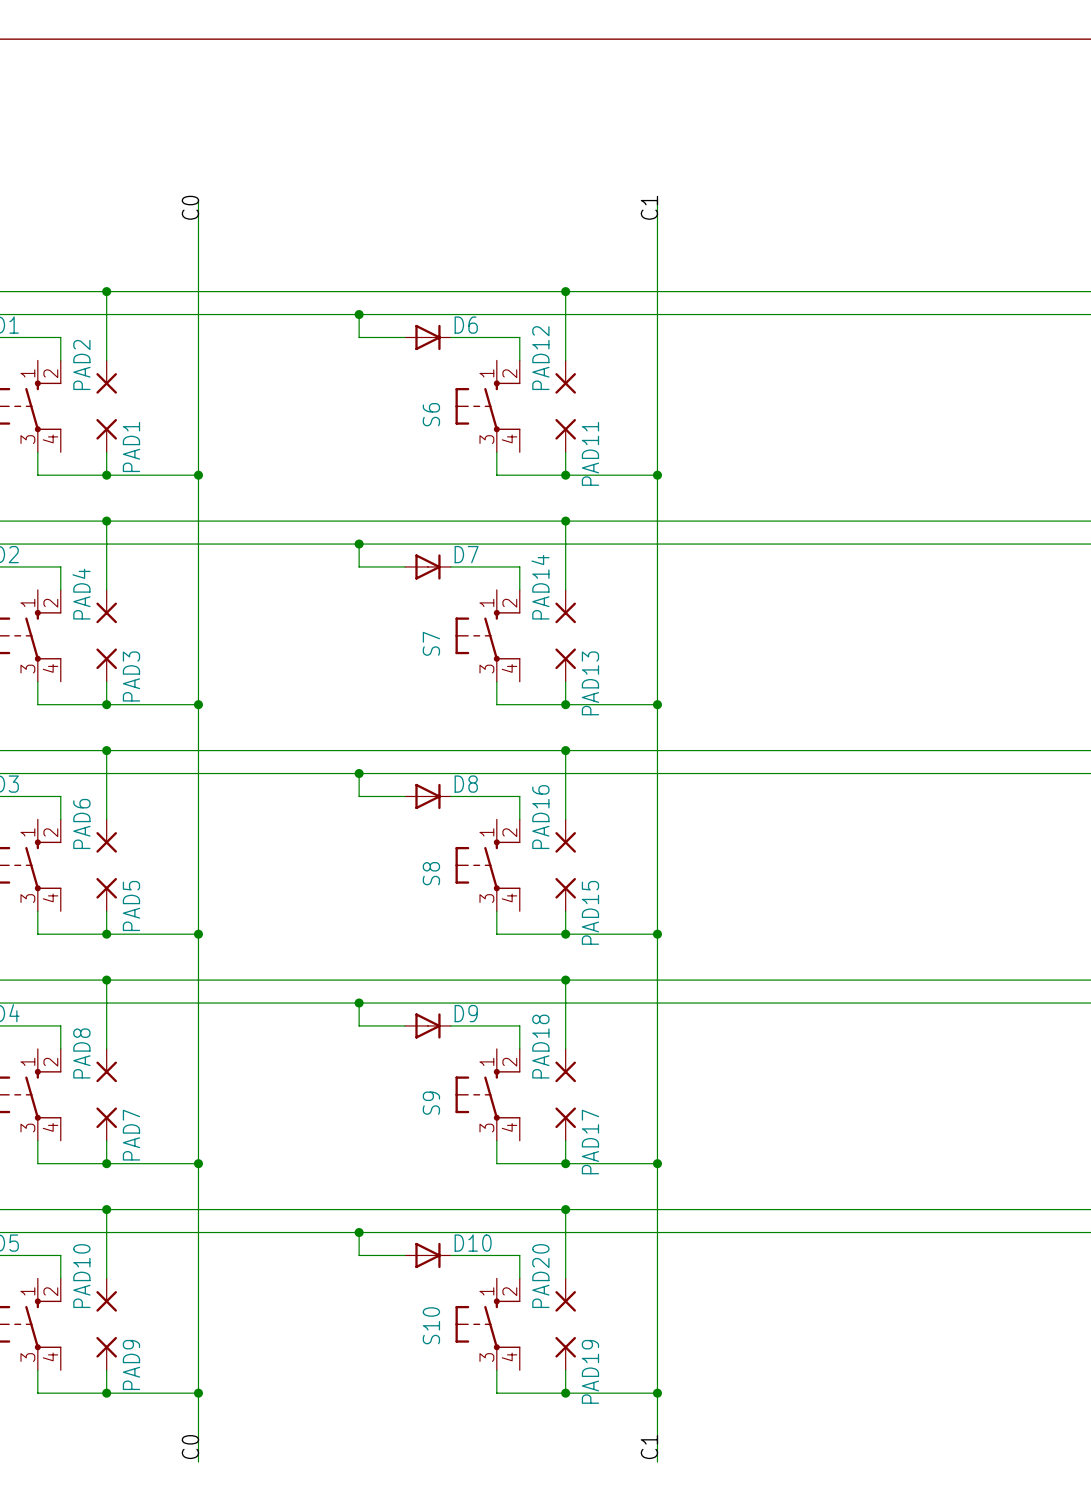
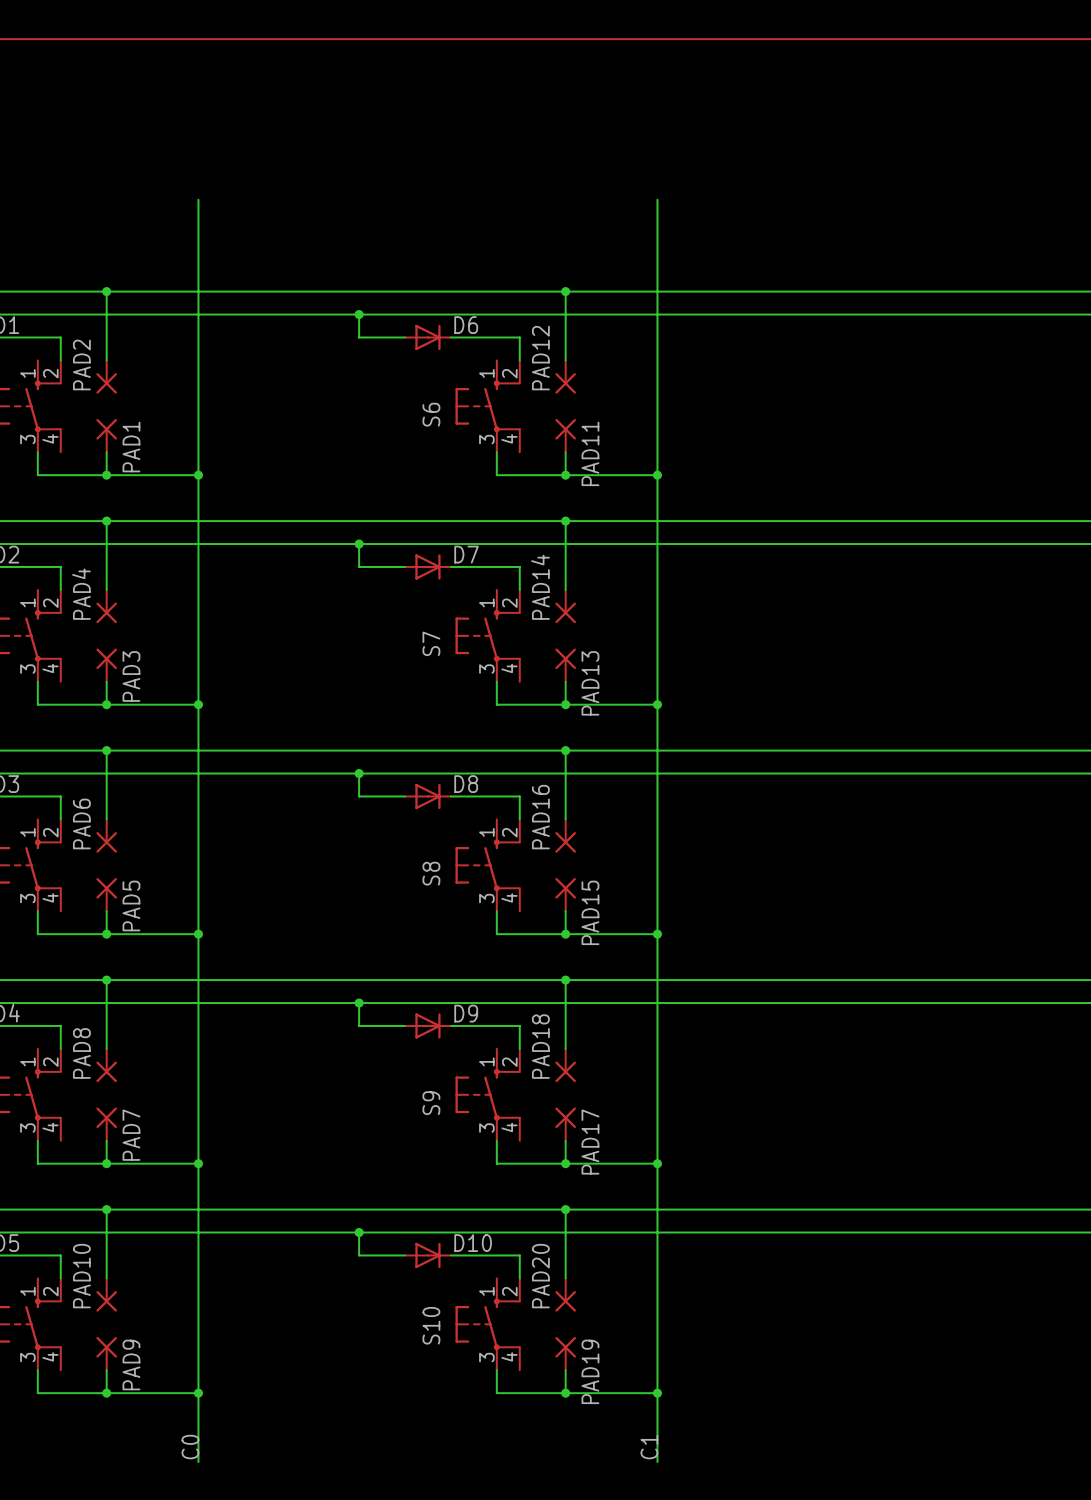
label: C0 (190, 207) -> none
label: C1 (649, 207) -> none

